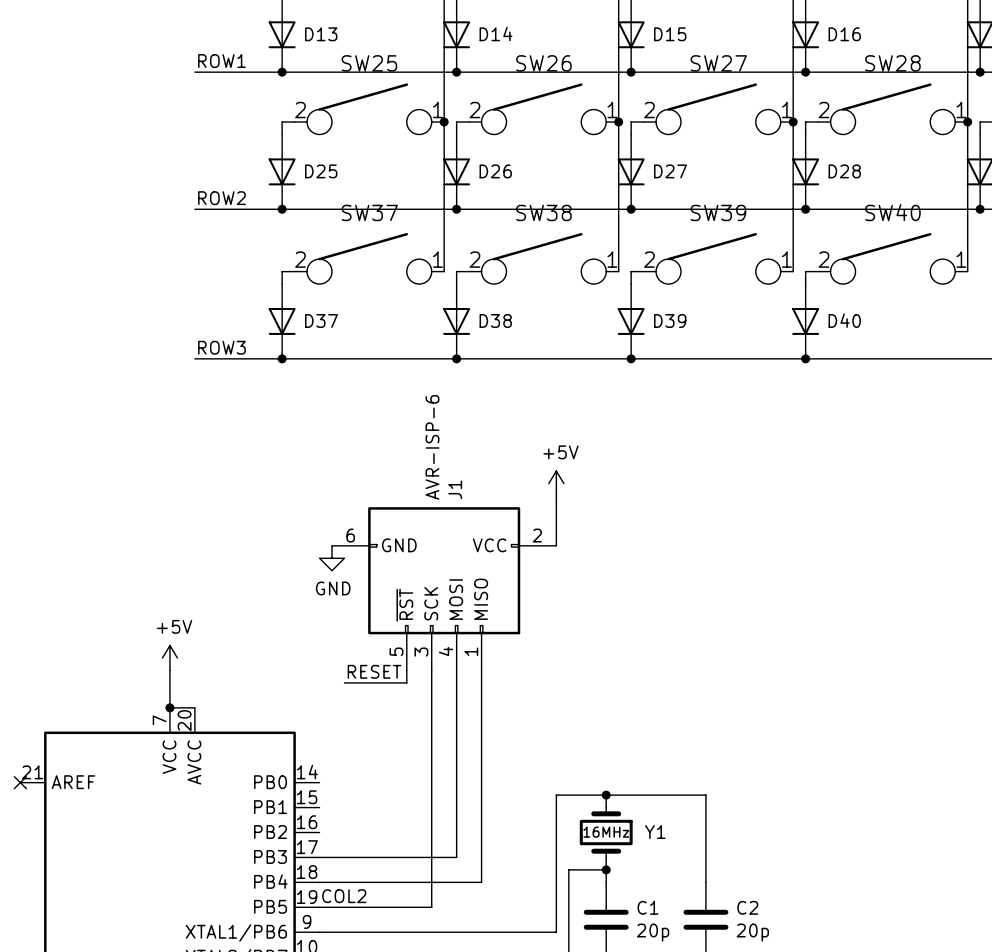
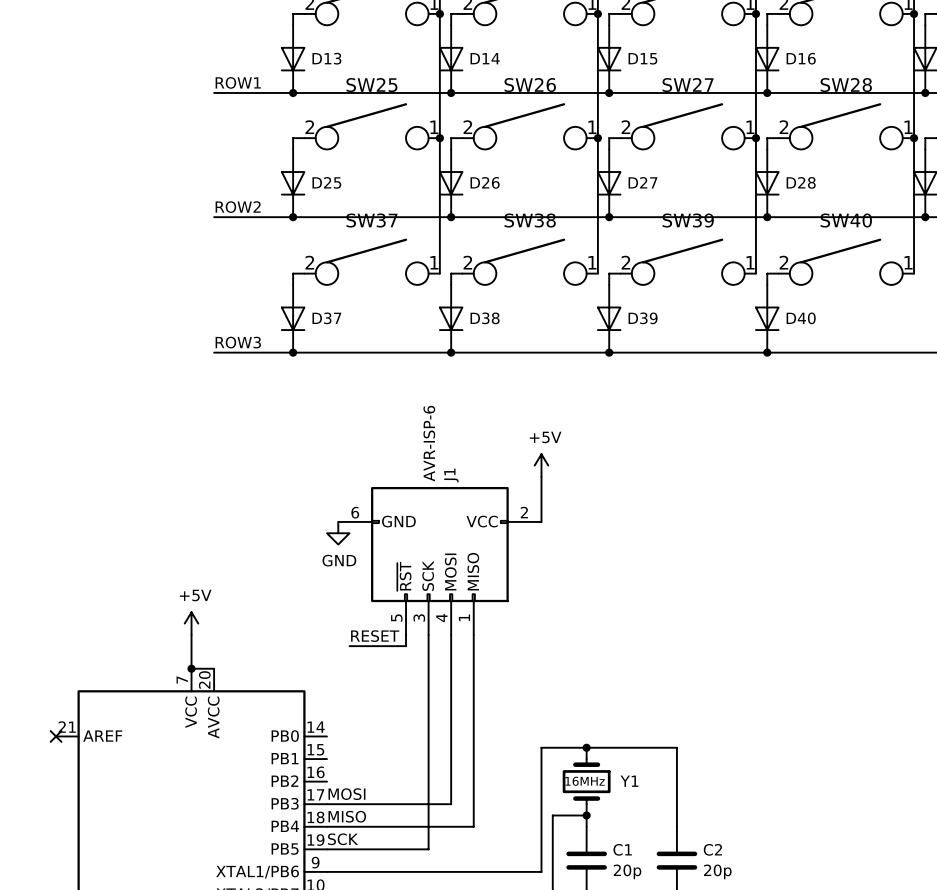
label: none -> MOSI (346, 794)
label: none -> MISO (347, 816)
label: COL2 (344, 896) -> SCK (343, 839)

